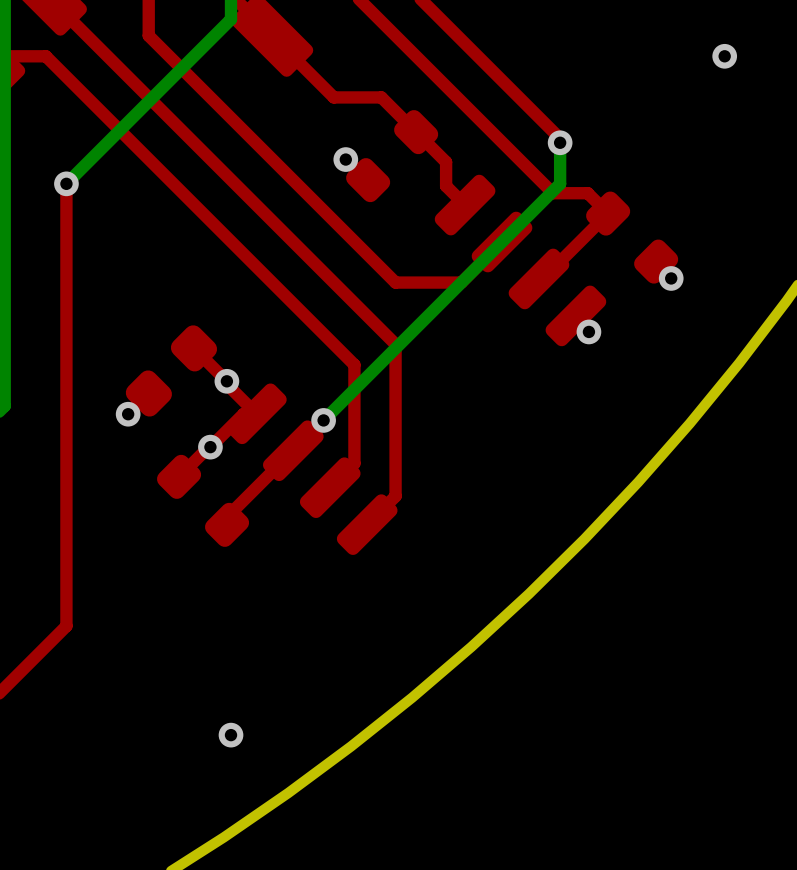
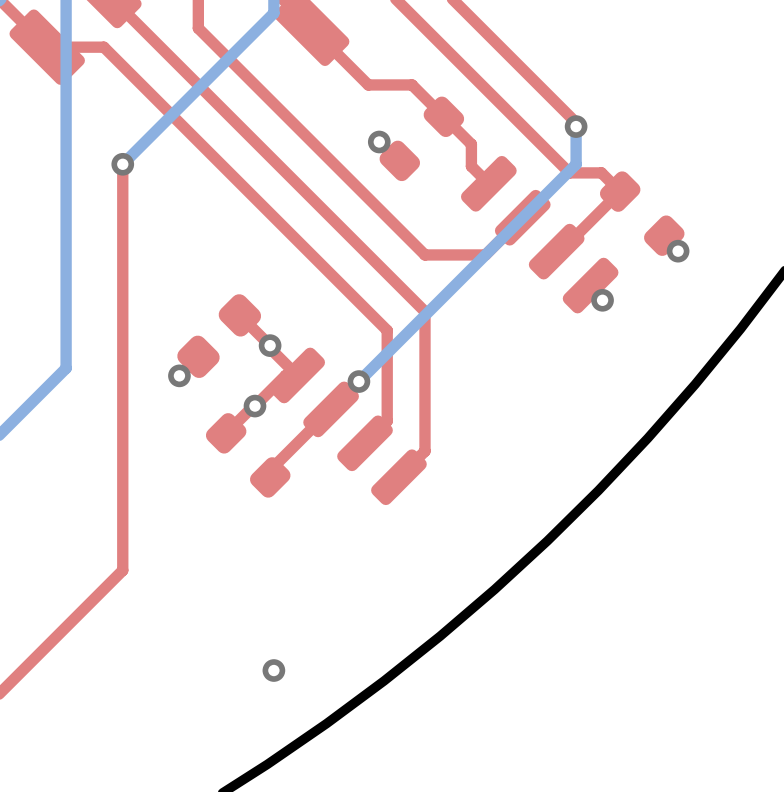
via: (724, 56) -> none

